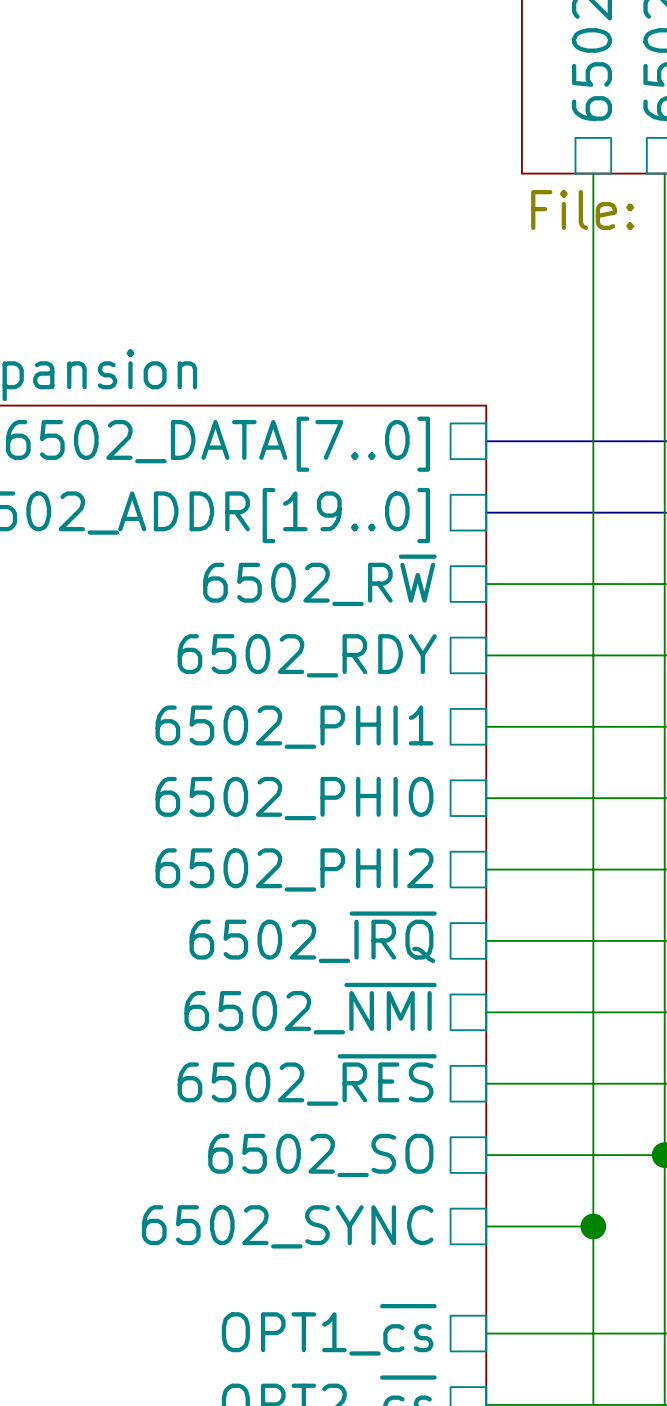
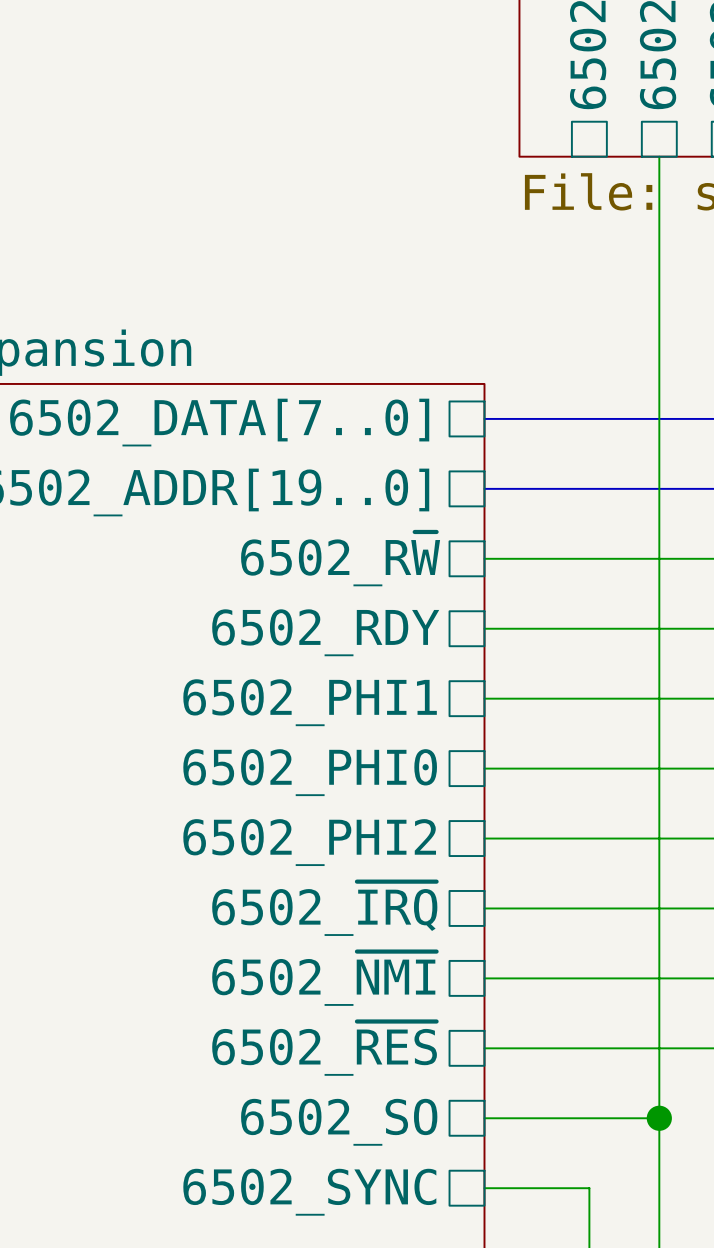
wire: (593, 173) (593, 1226) -> none
junction: (593, 1226) -> none

